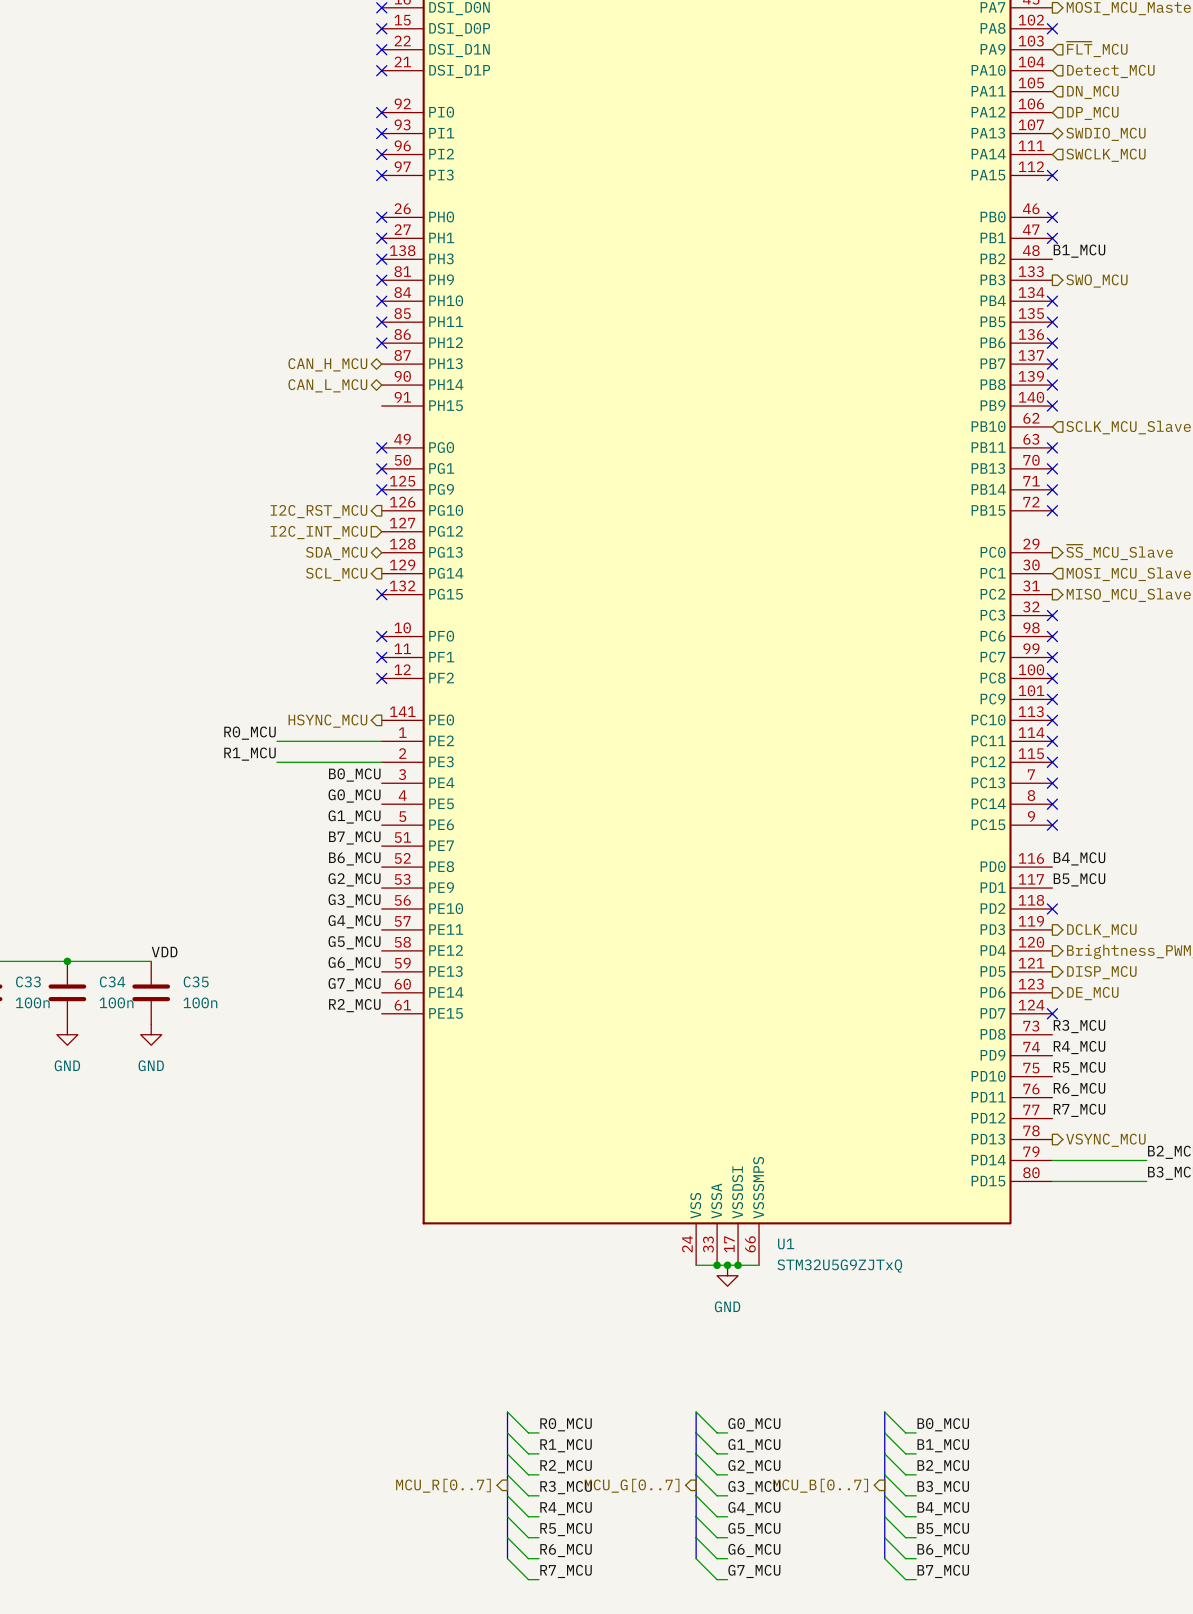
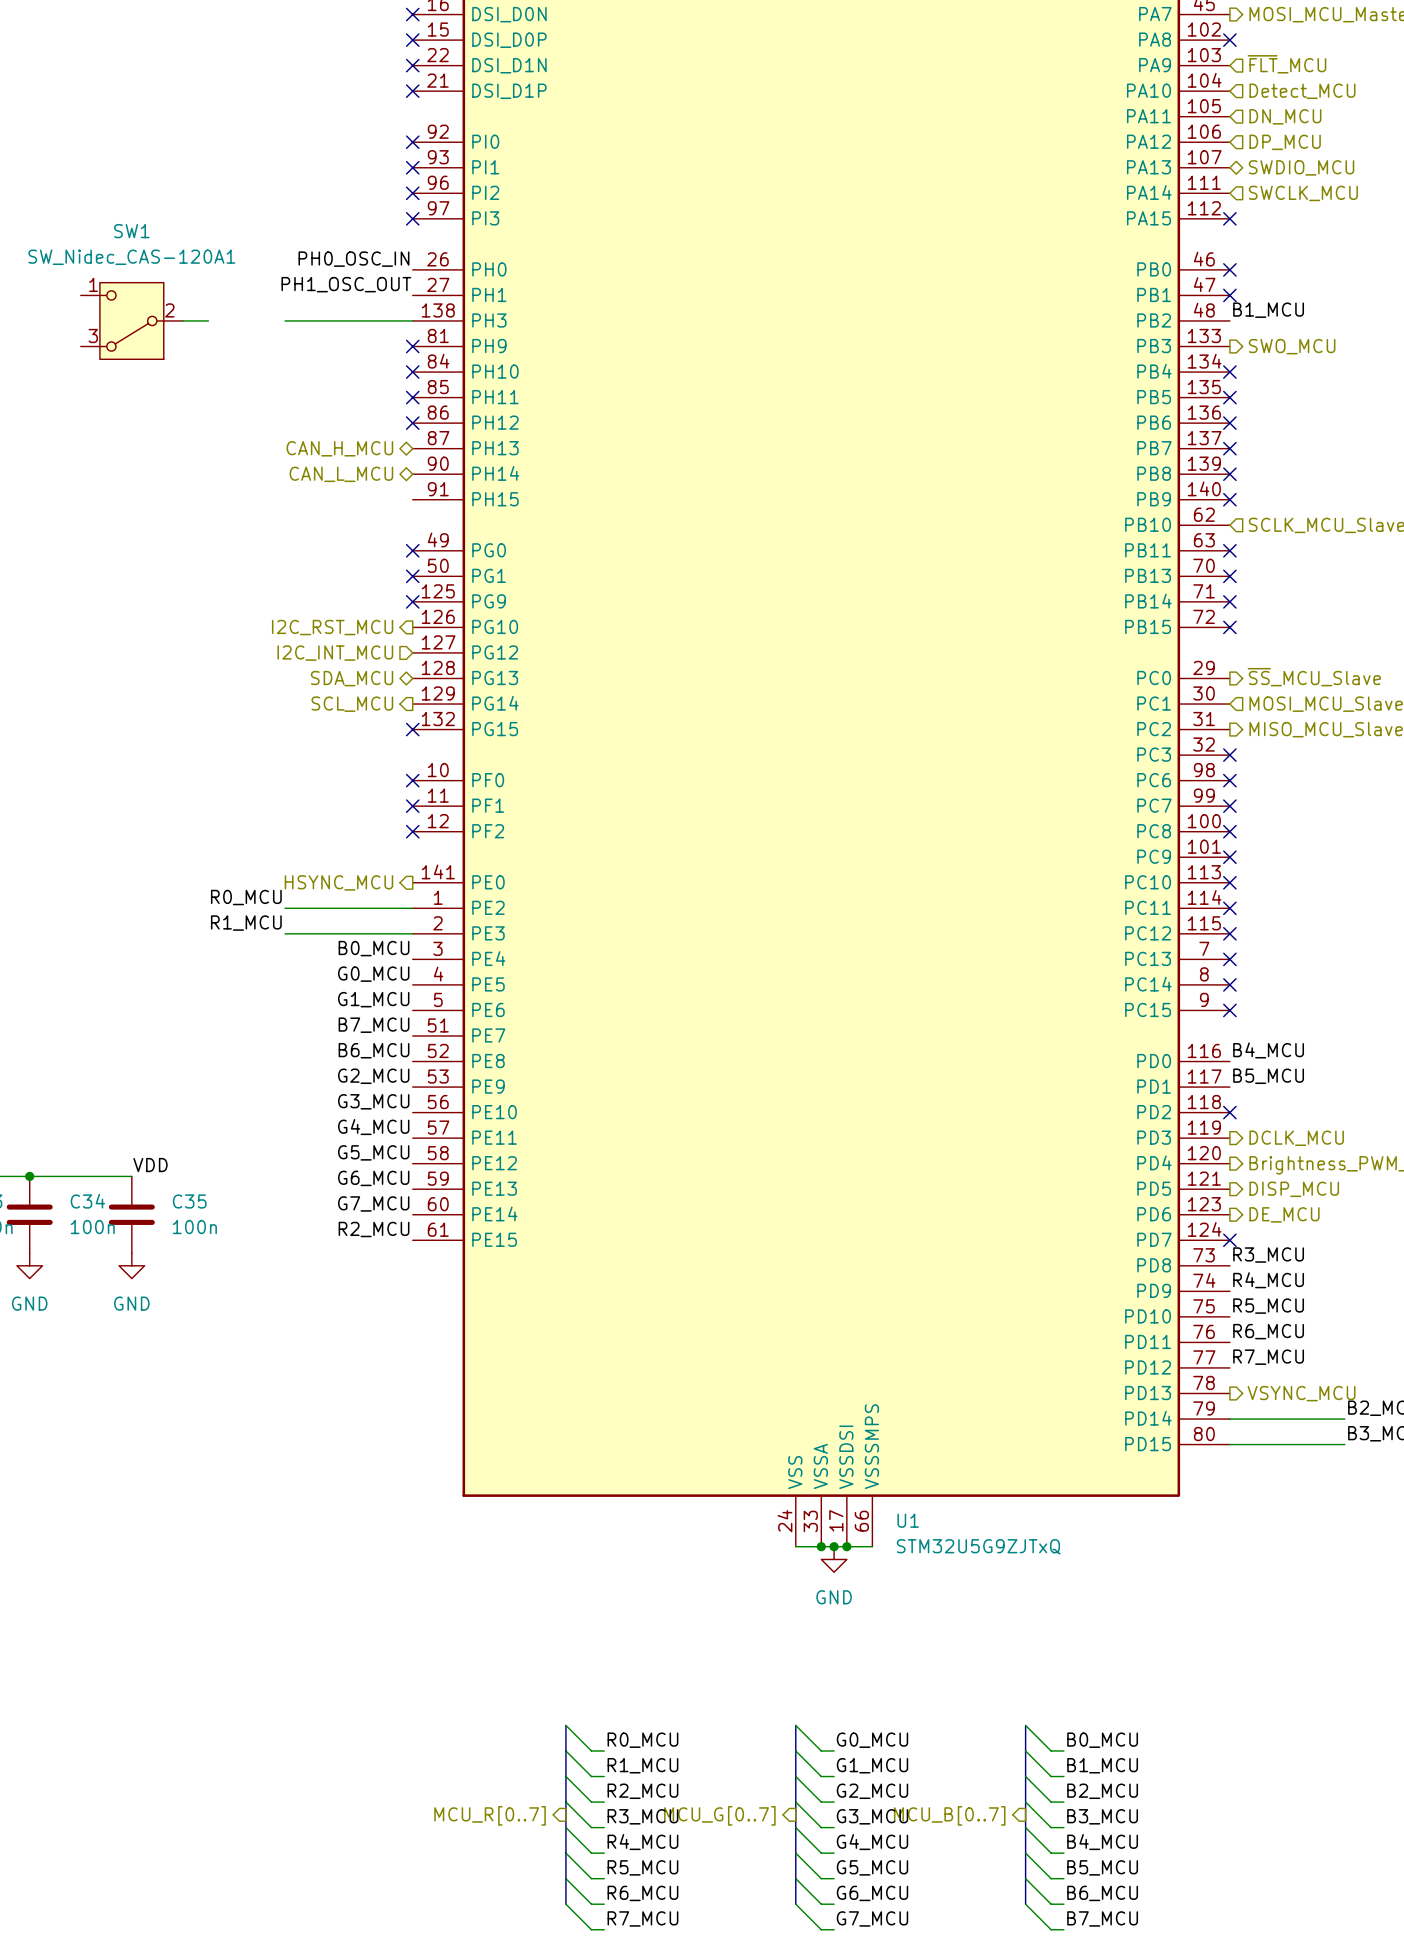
label: none -> PH0_OSC_IN (353, 259)
no-connect mark: (381, 217) -> none
label: none -> PH1_OSC_OUT (346, 284)
no-connect mark: (381, 238) -> none
SW1: none -> SW_Nidec_CAS-120A1 (131, 320)
wire: none -> (182, 320) (208, 320)
wire: none -> (285, 320) (412, 320)
no-connect mark: (381, 259) -> none

